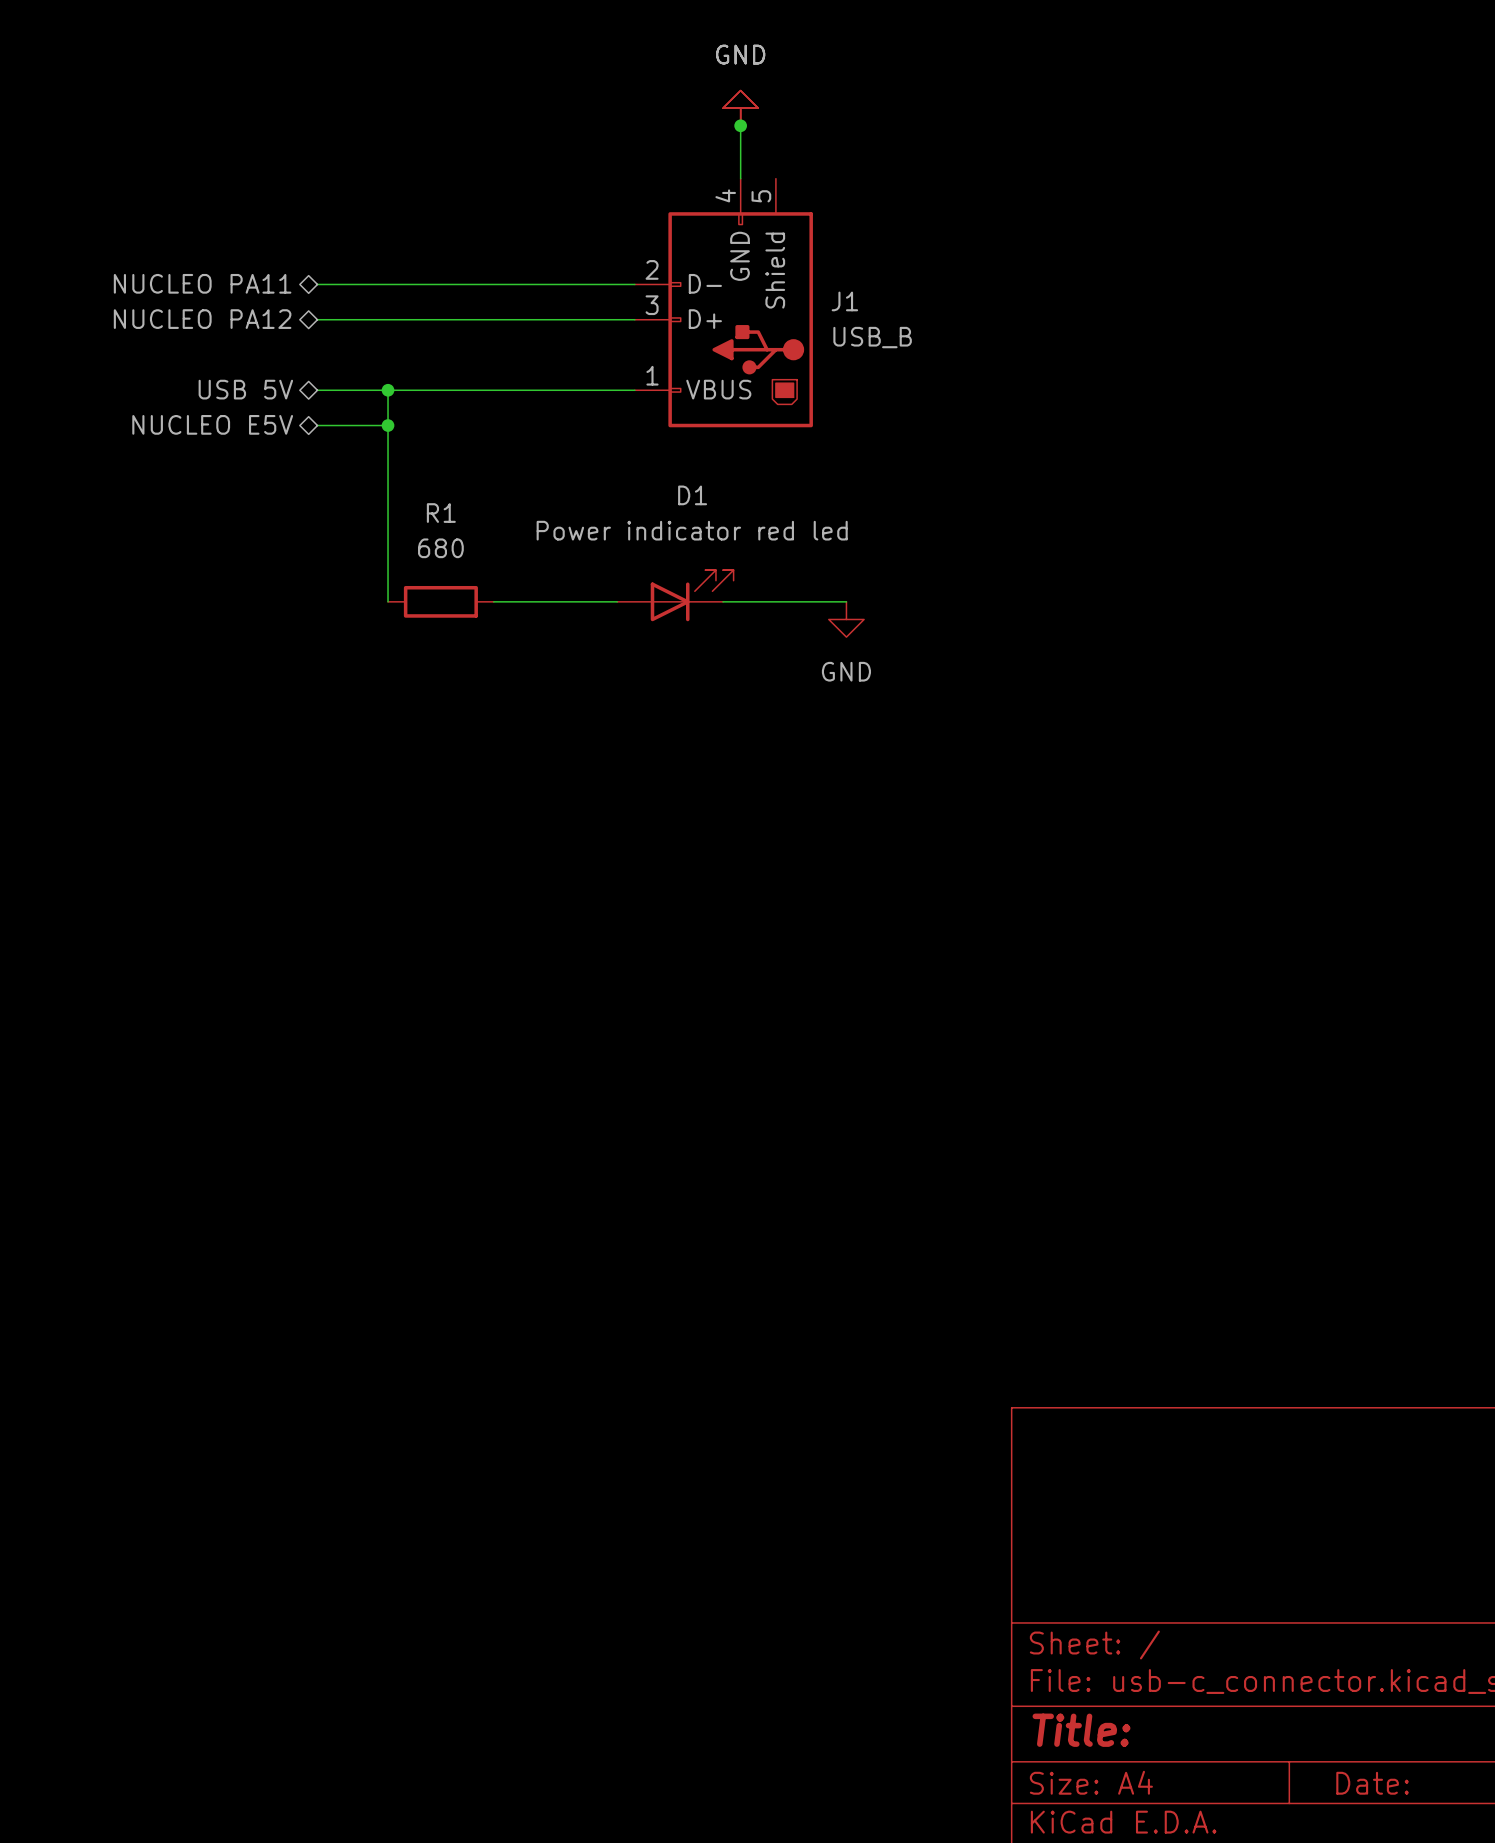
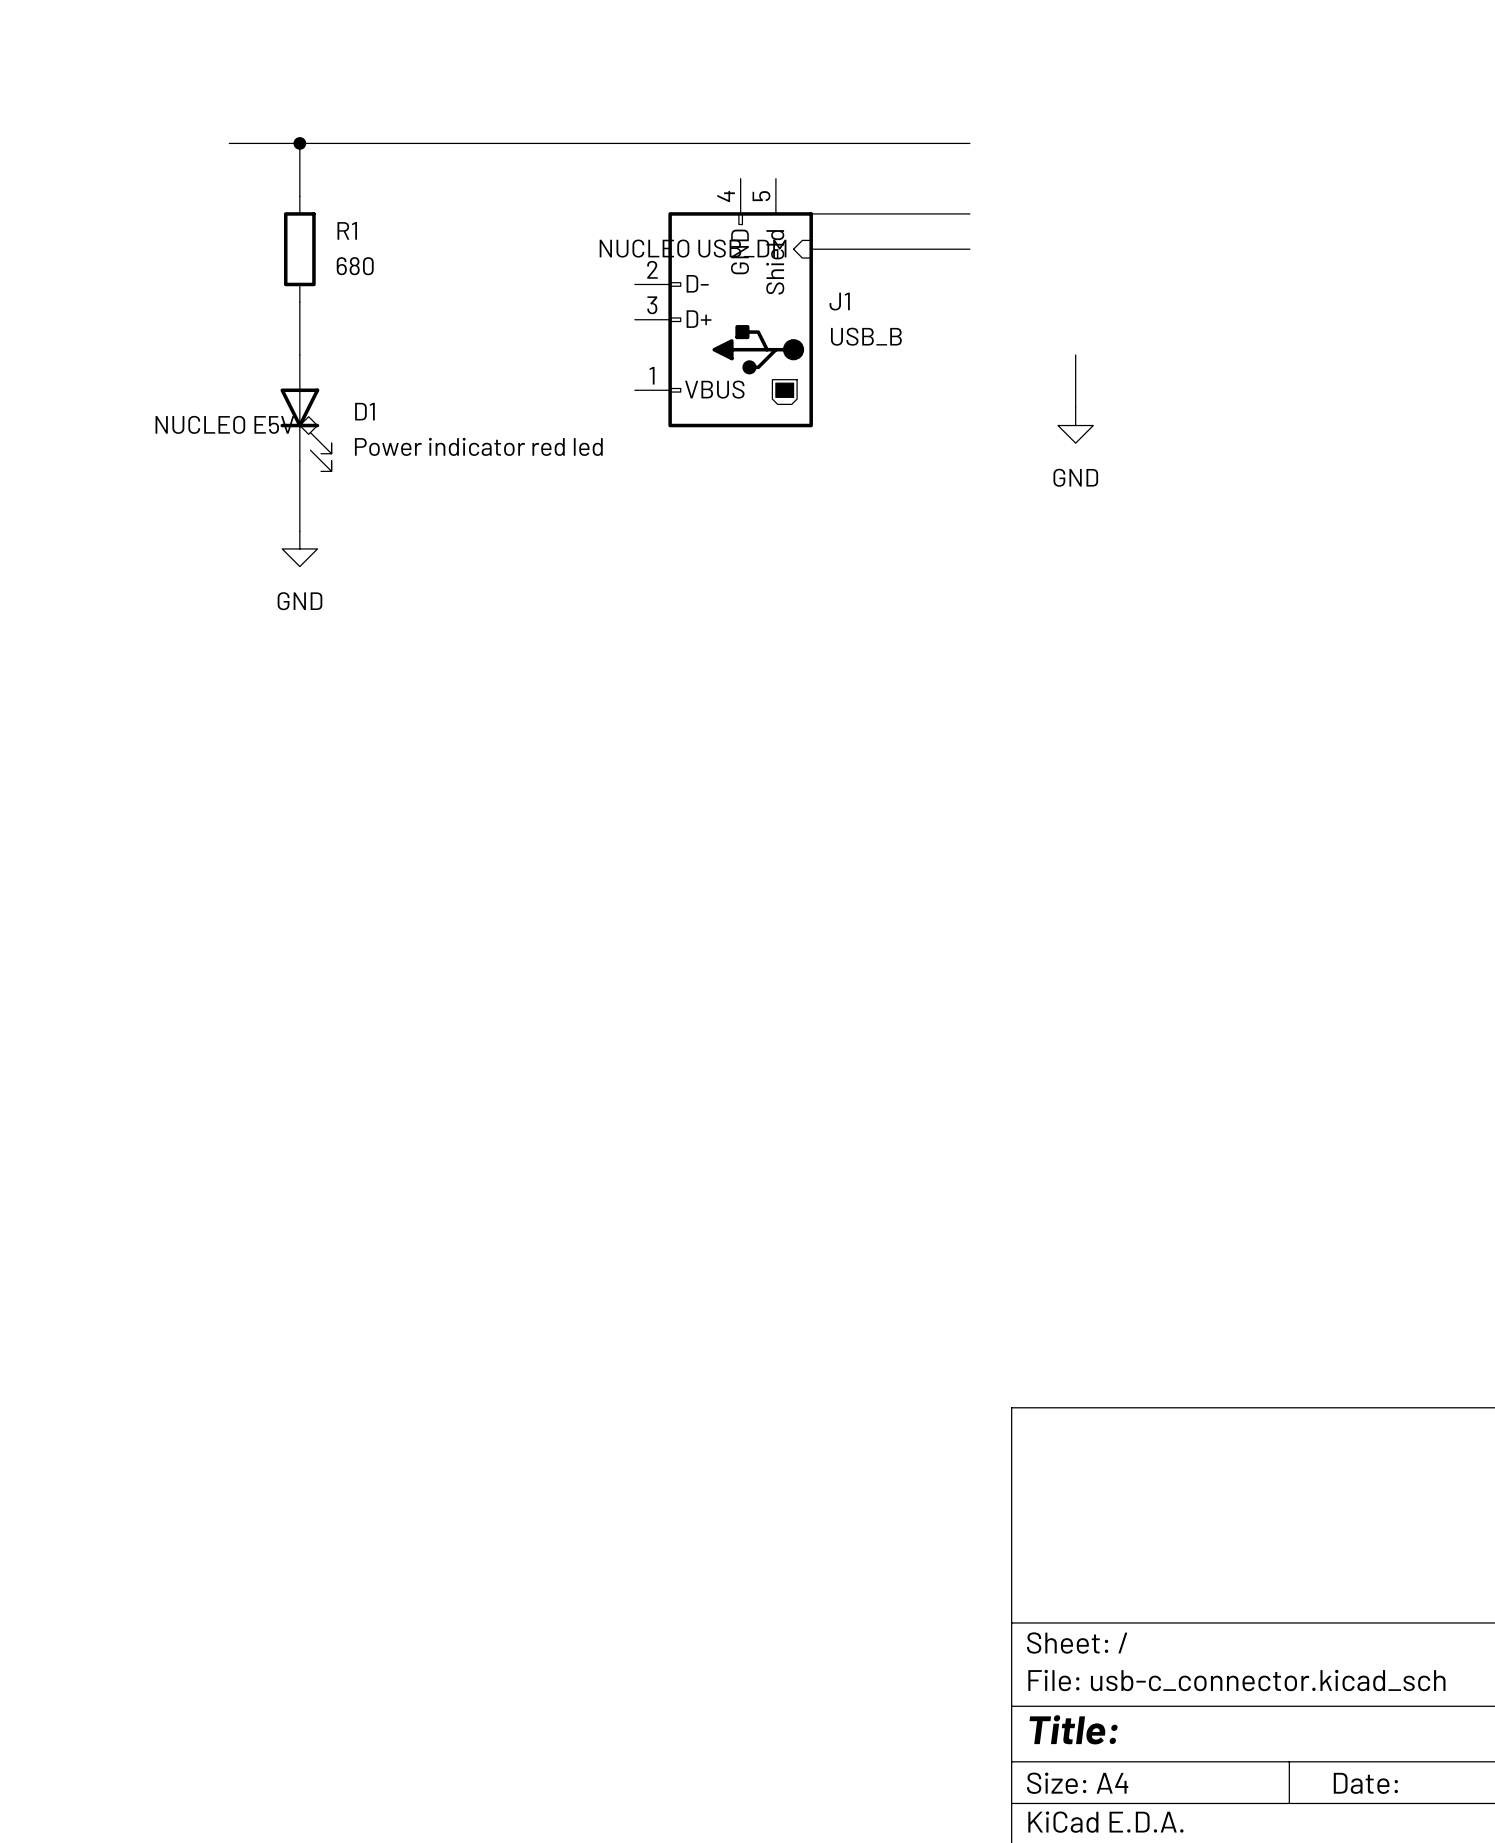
power symbol: GND (740, 108) -> none
wire: (740, 125) (740, 178) -> none
junction: (740, 125) -> none
wire: none -> (229, 143) (969, 143)
wire: none -> (299, 143) (299, 196)
junction: none -> (299, 143)
wire: none -> (811, 213) (969, 213)
hierarchical label: none -> NUCLEO USB_DM (693, 248)
wire: none -> (811, 249) (969, 249)
hierarchical label: NUCLEO PA11 (202, 283) -> none
wire: (317, 284) (634, 284) -> none
wire: none -> (299, 302) (299, 355)
hierarchical label: NUCLEO PA12 (202, 319) -> none
wire: (317, 319) (634, 319) -> none
wire: none -> (1075, 355) (1075, 407)
hierarchical label: USB 5V (245, 389) -> none
wire: (317, 390) (634, 390) -> none
wire: (388, 390) (388, 601) -> none
junction: (388, 390) -> none
wire: (317, 425) (388, 425) -> none
junction: (388, 425) -> none
power symbol: none -> GND (1075, 425)
wire: none -> (299, 460) (299, 531)
D1 name position: D1 (692, 495) -> D1 (364, 411)
R1 name position: R1 (441, 513) -> R1 (347, 230)
D1 value position: Power indicator red led (692, 530) -> Power indicator red led (478, 446)
power symbol: none -> GND (299, 548)
D1 position: (675, 595) -> (306, 413)
D1 rotation: 0° (692, 595) -> 90° clockwise (306, 429)
R1 rotation: 0° (440, 601) -> 90° clockwise (299, 249)
R1 position: (440, 601) -> (299, 249)
wire: (493, 601) (617, 601) -> none
wire: (723, 601) (846, 601) -> none
power symbol: GND (846, 619) -> none

